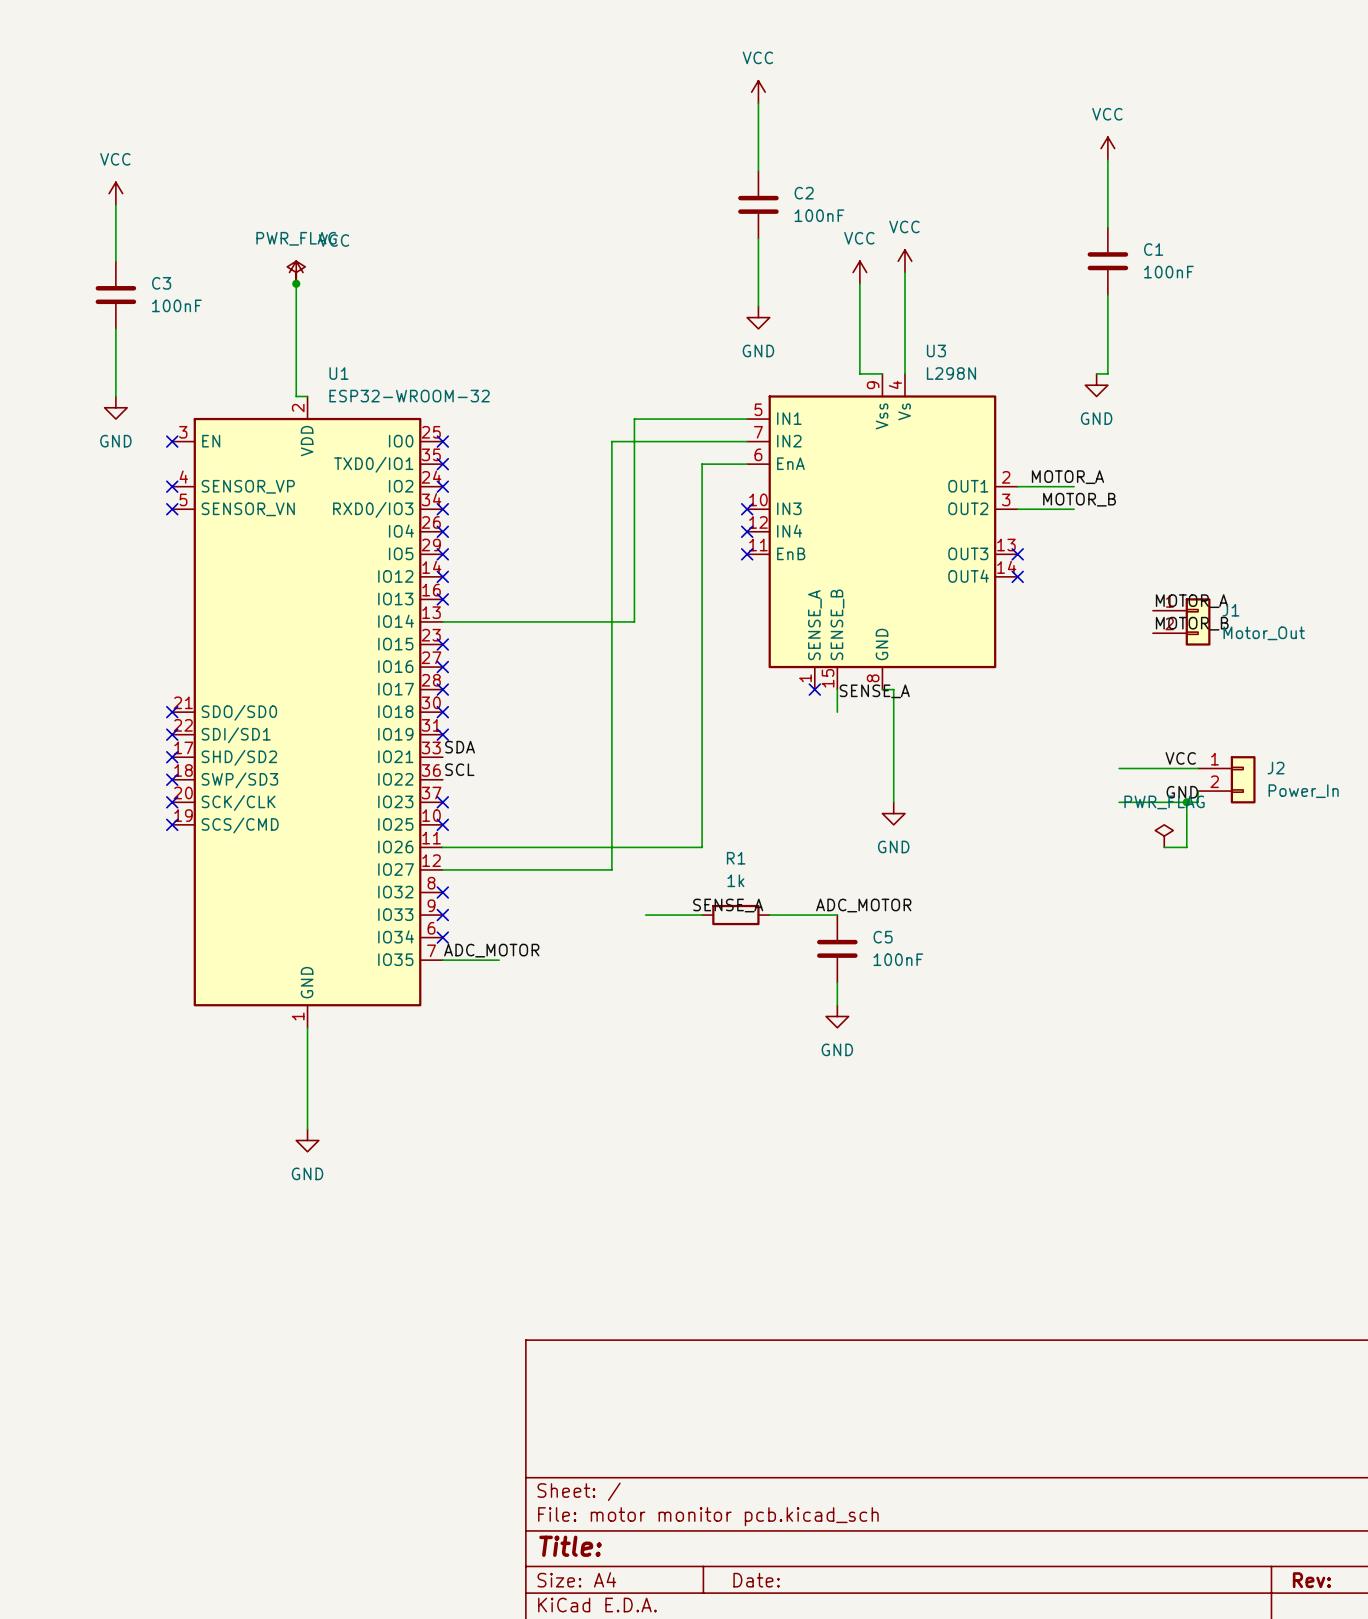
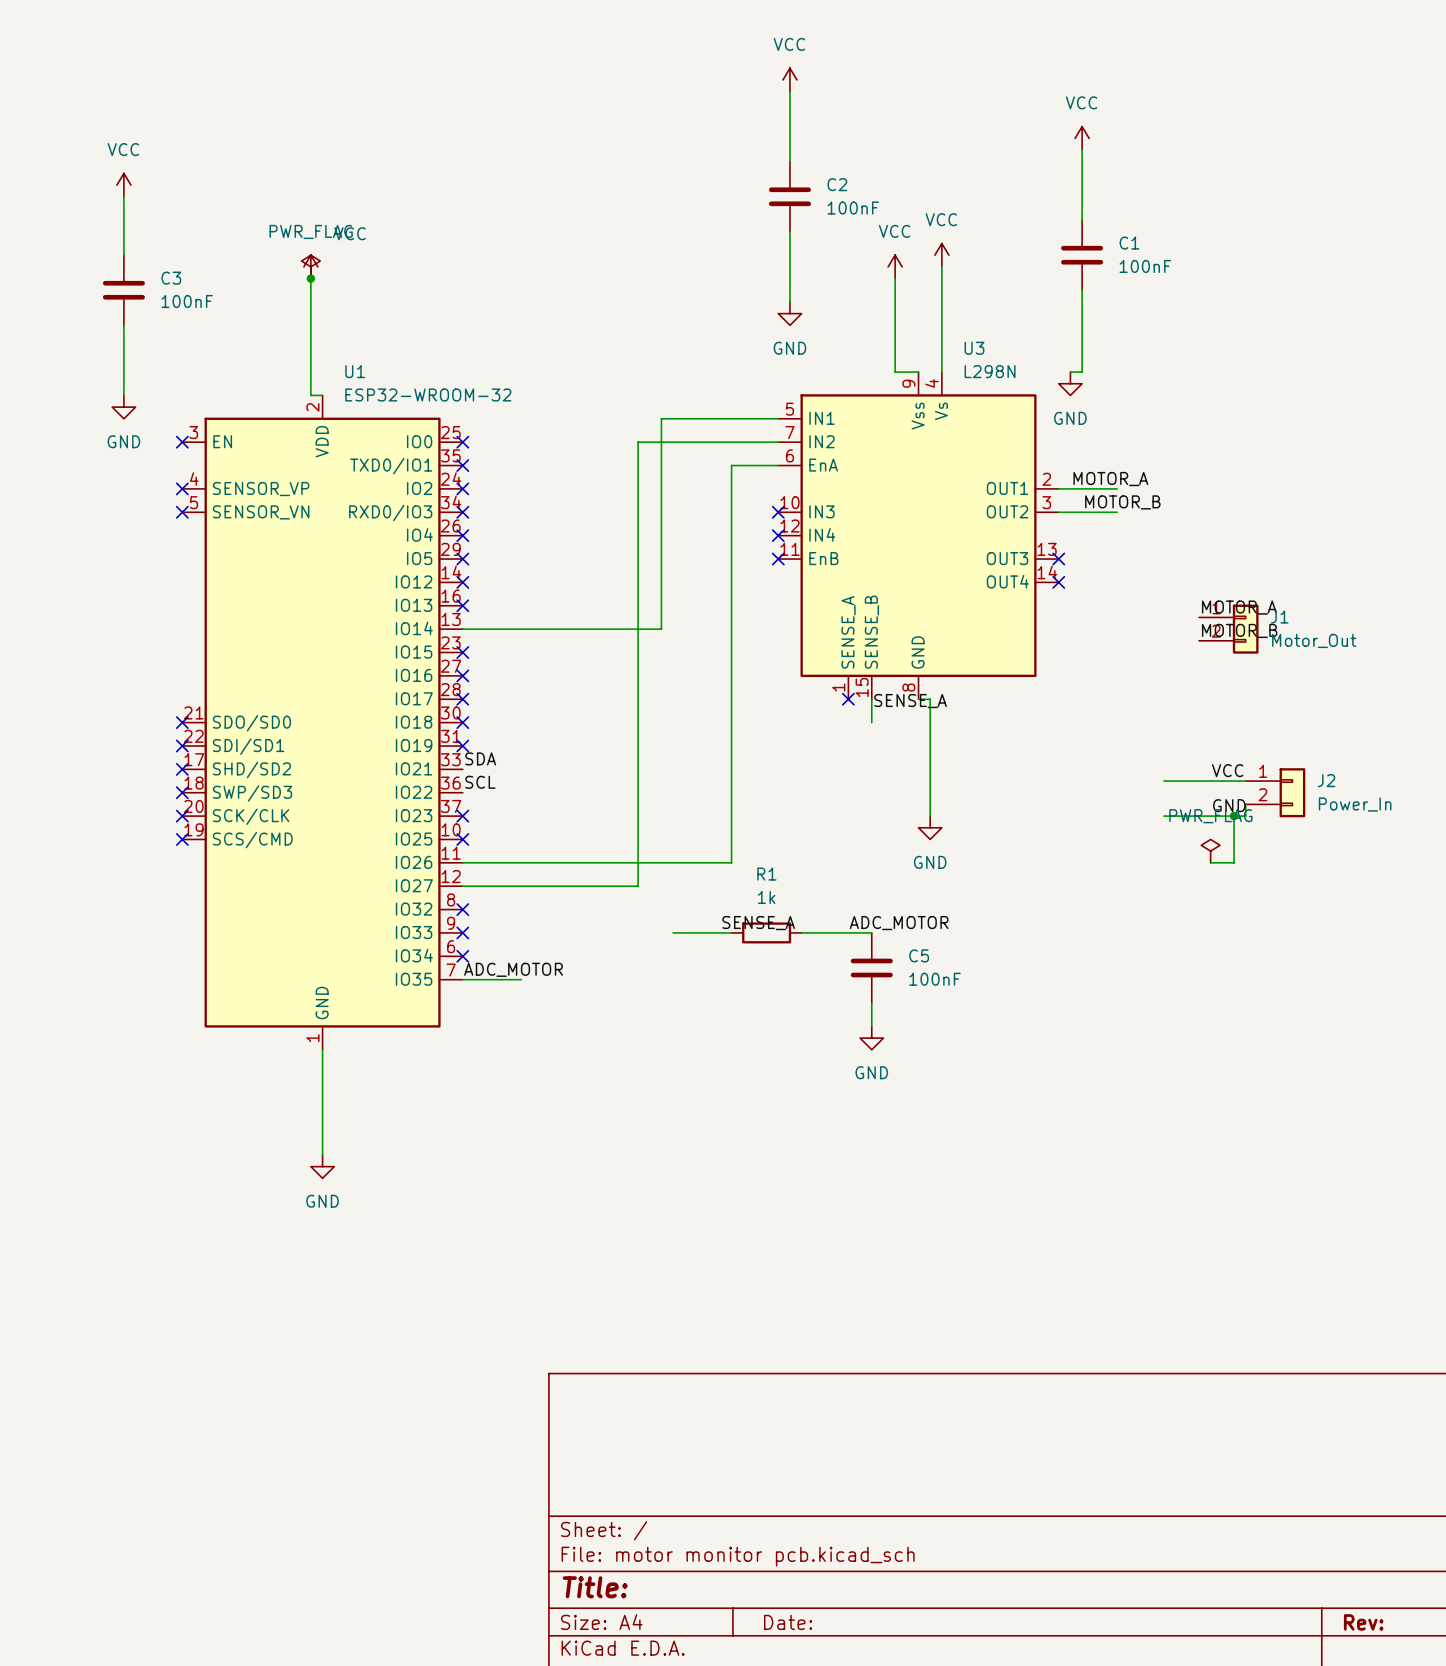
power symbol position: VCC (1107, 148) -> VCC (1082, 138)
wire: (1107, 159) (1107, 227) -> (1082, 150) (1082, 220)
C1 position: (1107, 261) -> (1082, 255)
wire: (1107, 295) (1107, 373) (1096, 373) -> (1082, 290) (1082, 372) (1070, 372)
power symbol position: GND (1096, 385) -> GND (1070, 383)

